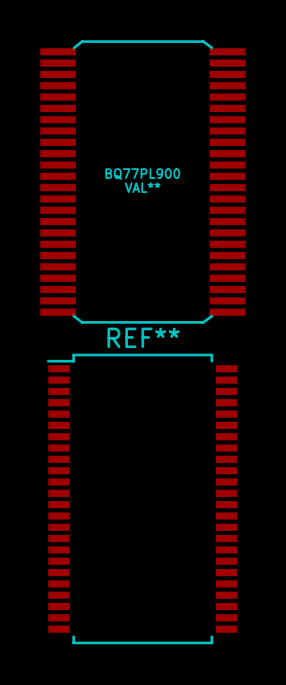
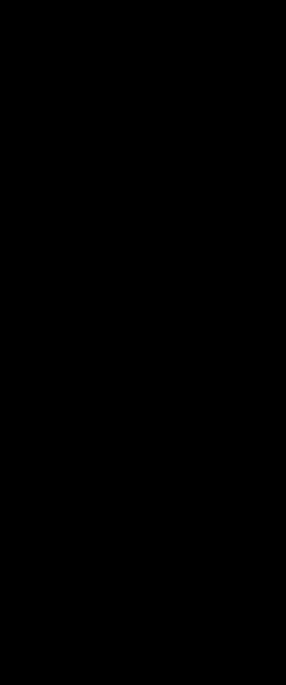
BQ77PL900: VAL** (142, 181) -> none
REF**: (142, 498) -> none

